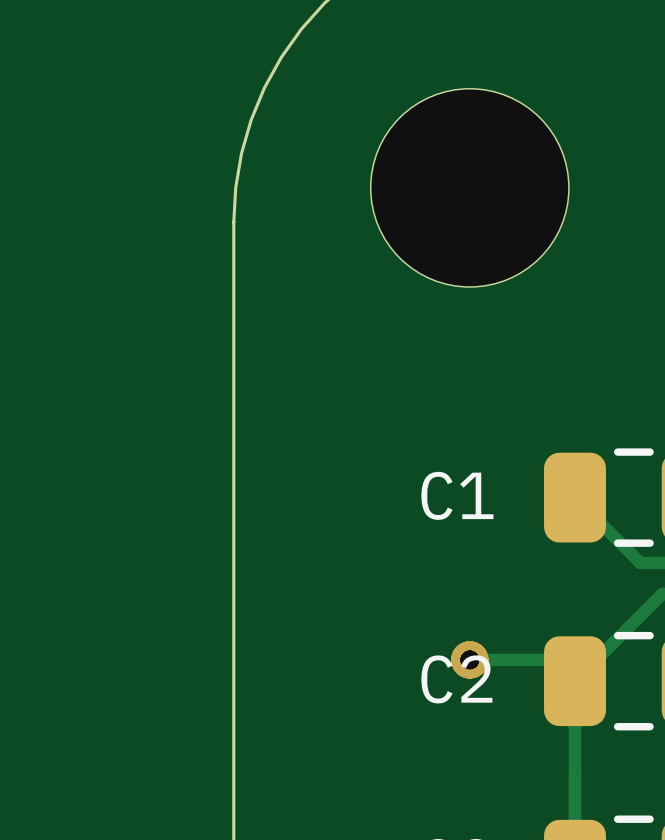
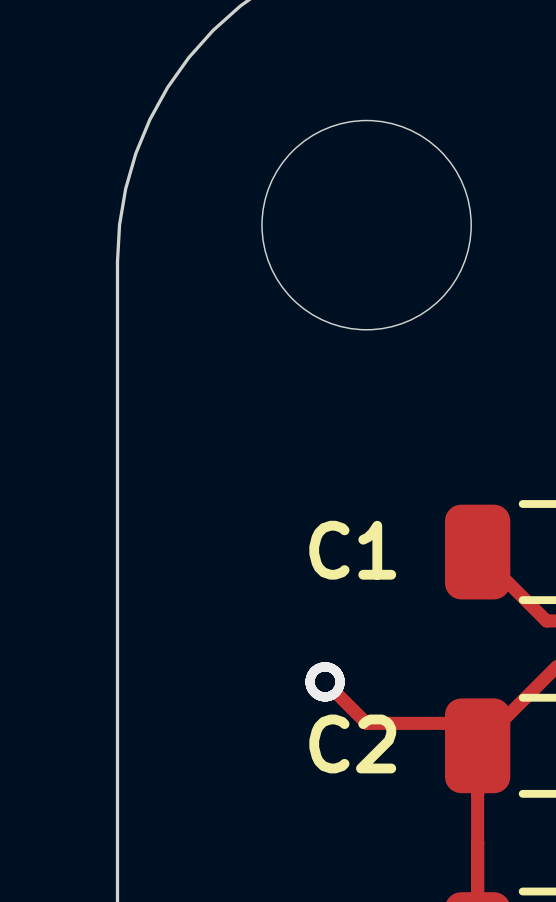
track: none -> (325, 681) (366, 723)
via position: (469, 659) -> (325, 681)

